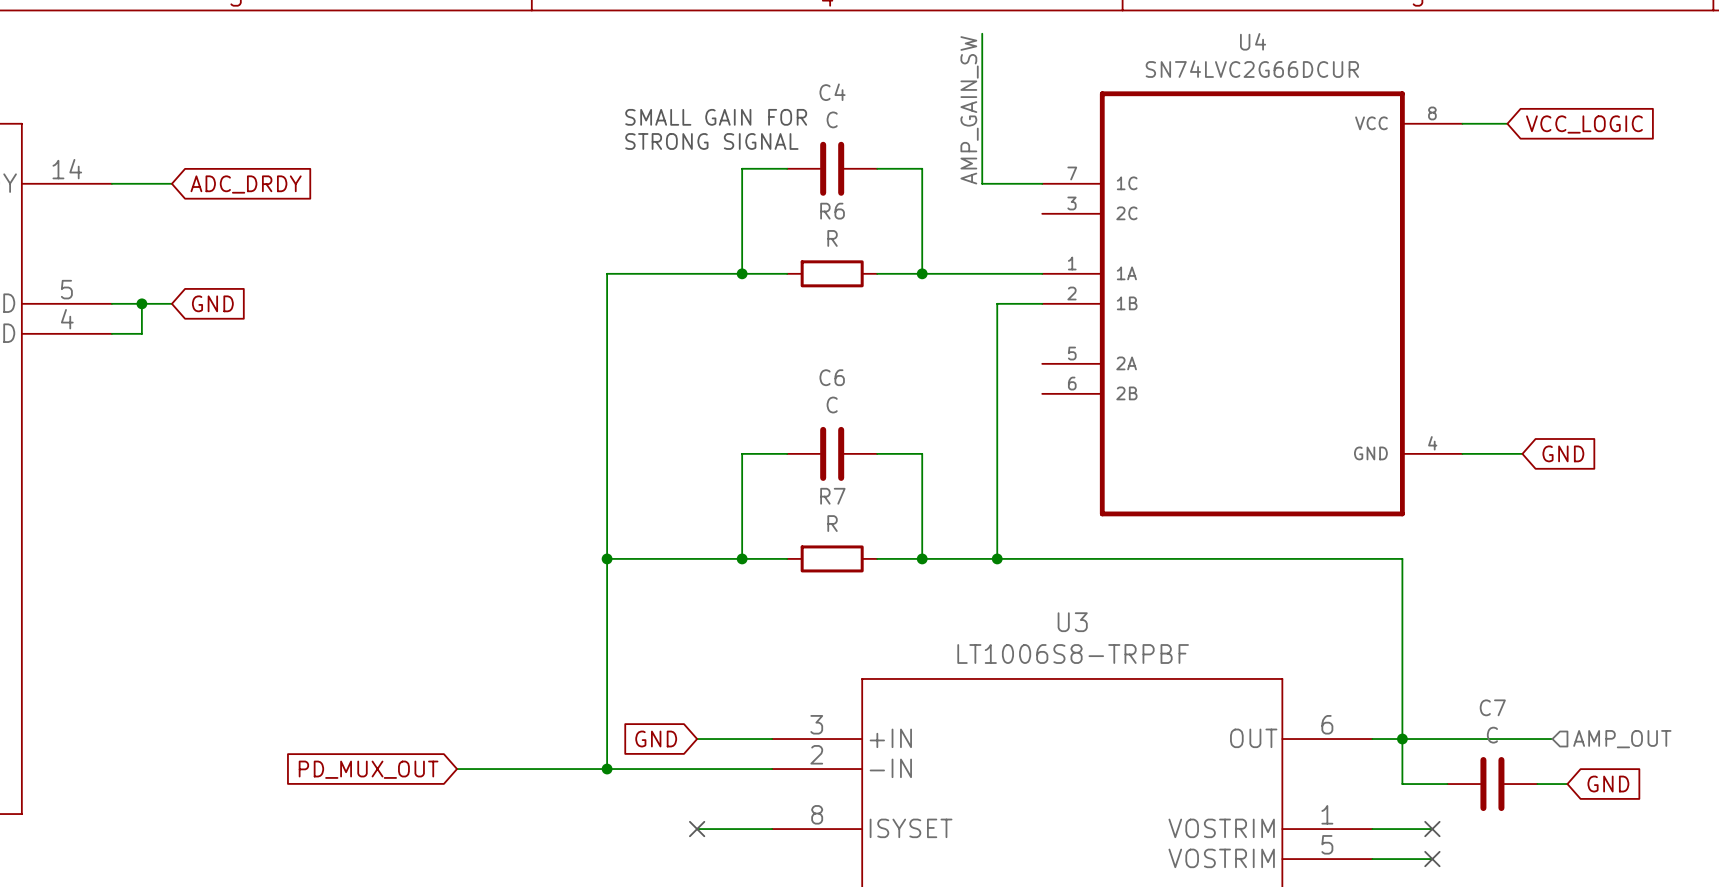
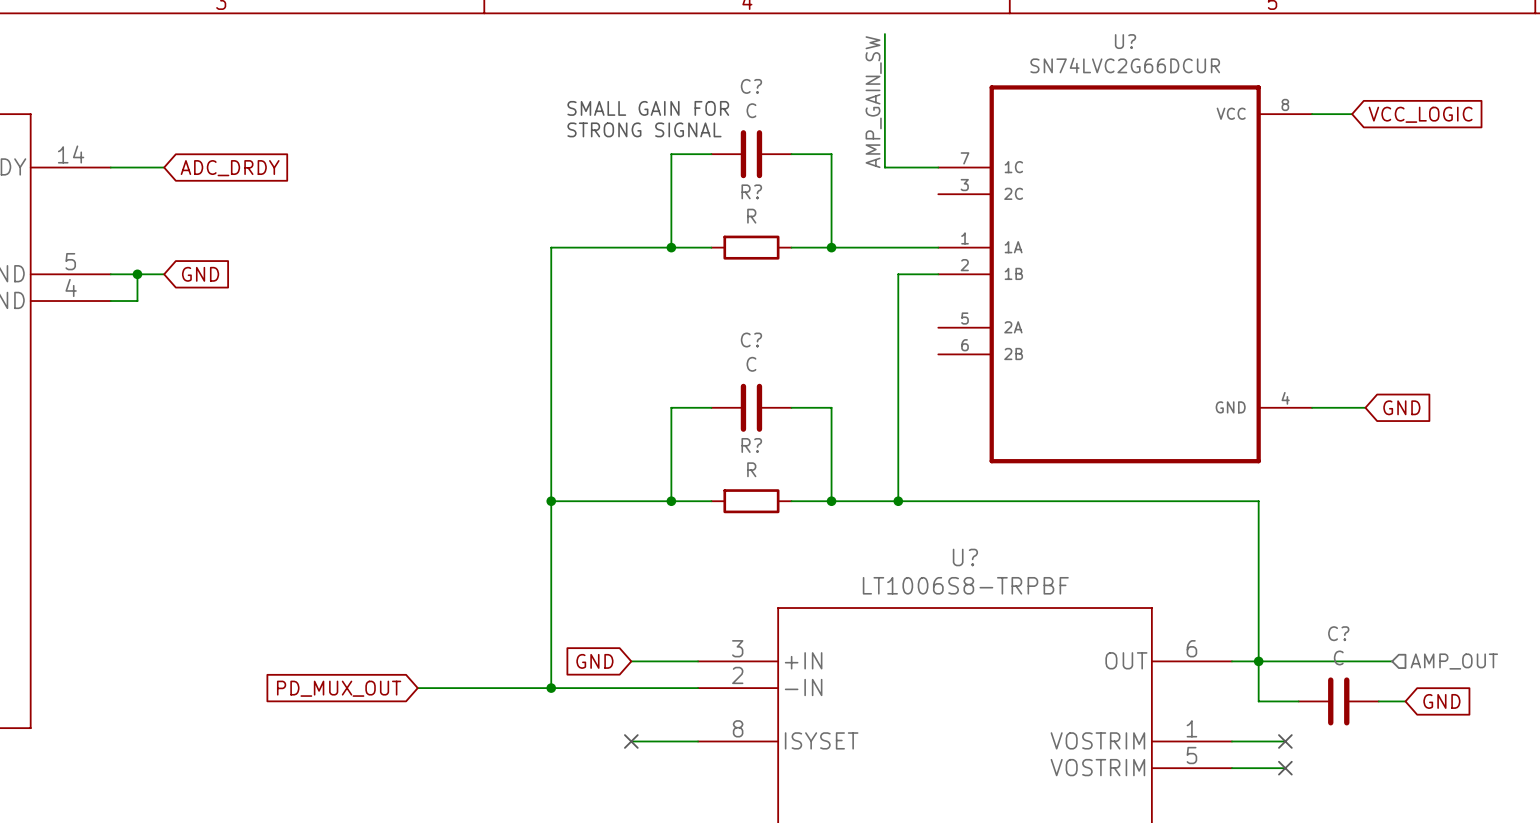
U4 name: U4 (1253, 41) -> U? (1125, 41)
C4 name: C4 (832, 92) -> C? (751, 86)
R6 name: R6 (832, 211) -> R? (751, 191)
C6 name: C6 (832, 377) -> C? (751, 340)
R7 name: R7 (832, 496) -> R? (751, 445)
U3 name: U3 (1072, 622) -> U? (965, 557)
C7 name: C7 (1492, 707) -> C? (1338, 633)

